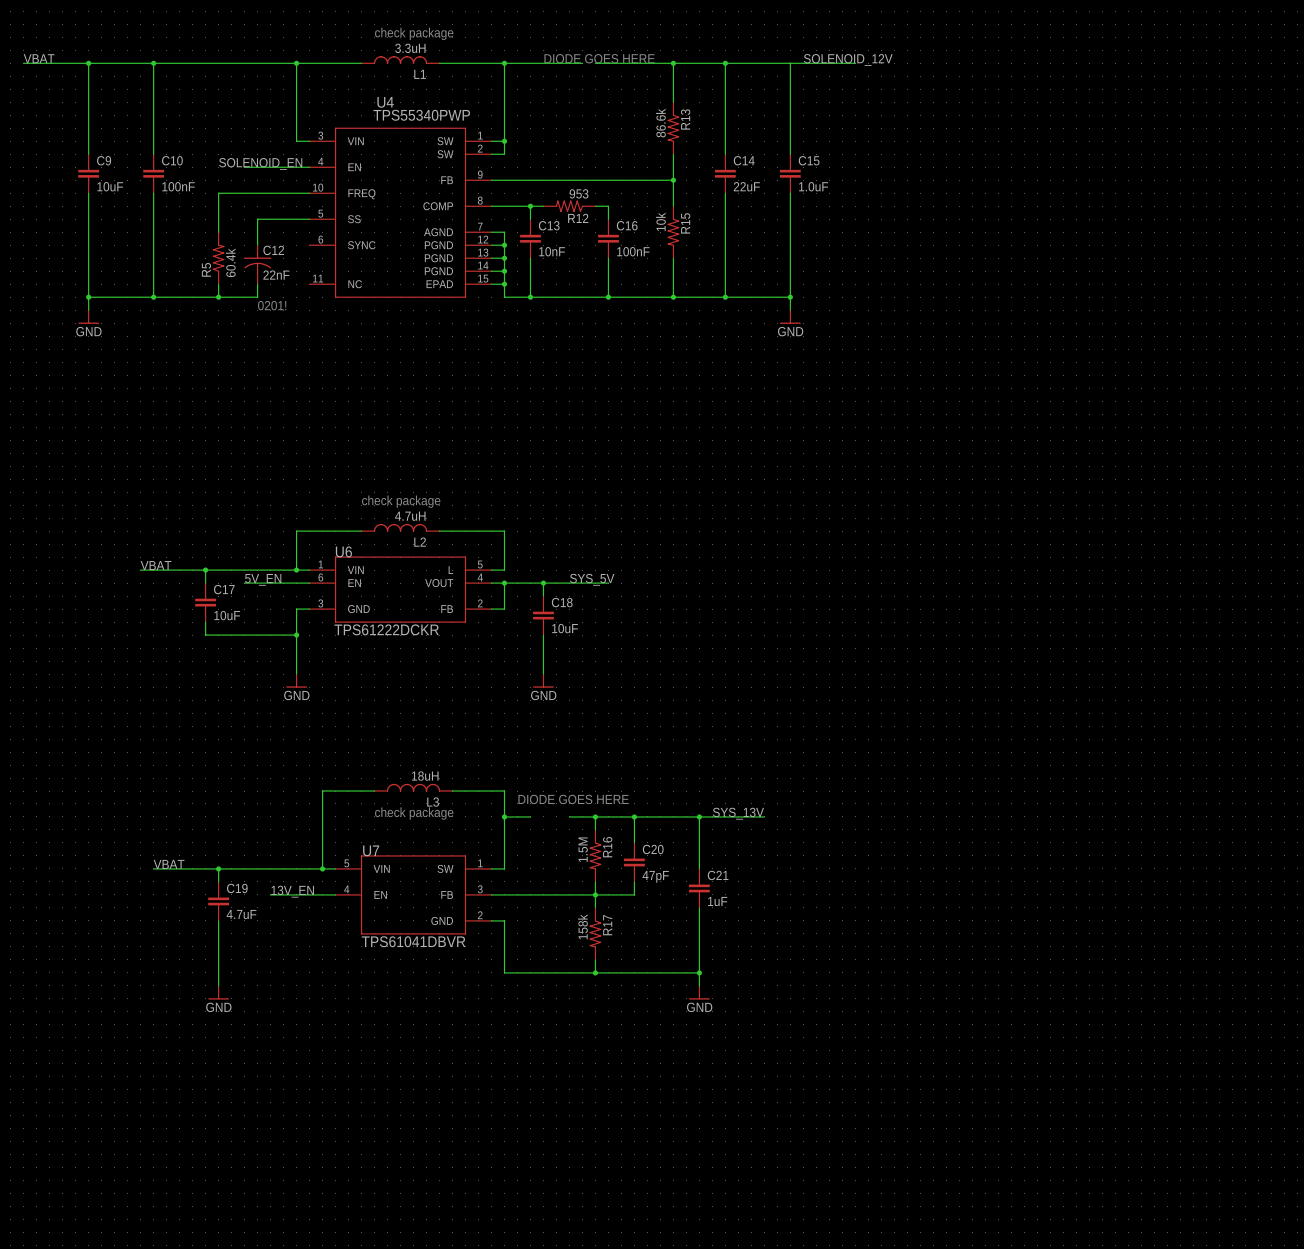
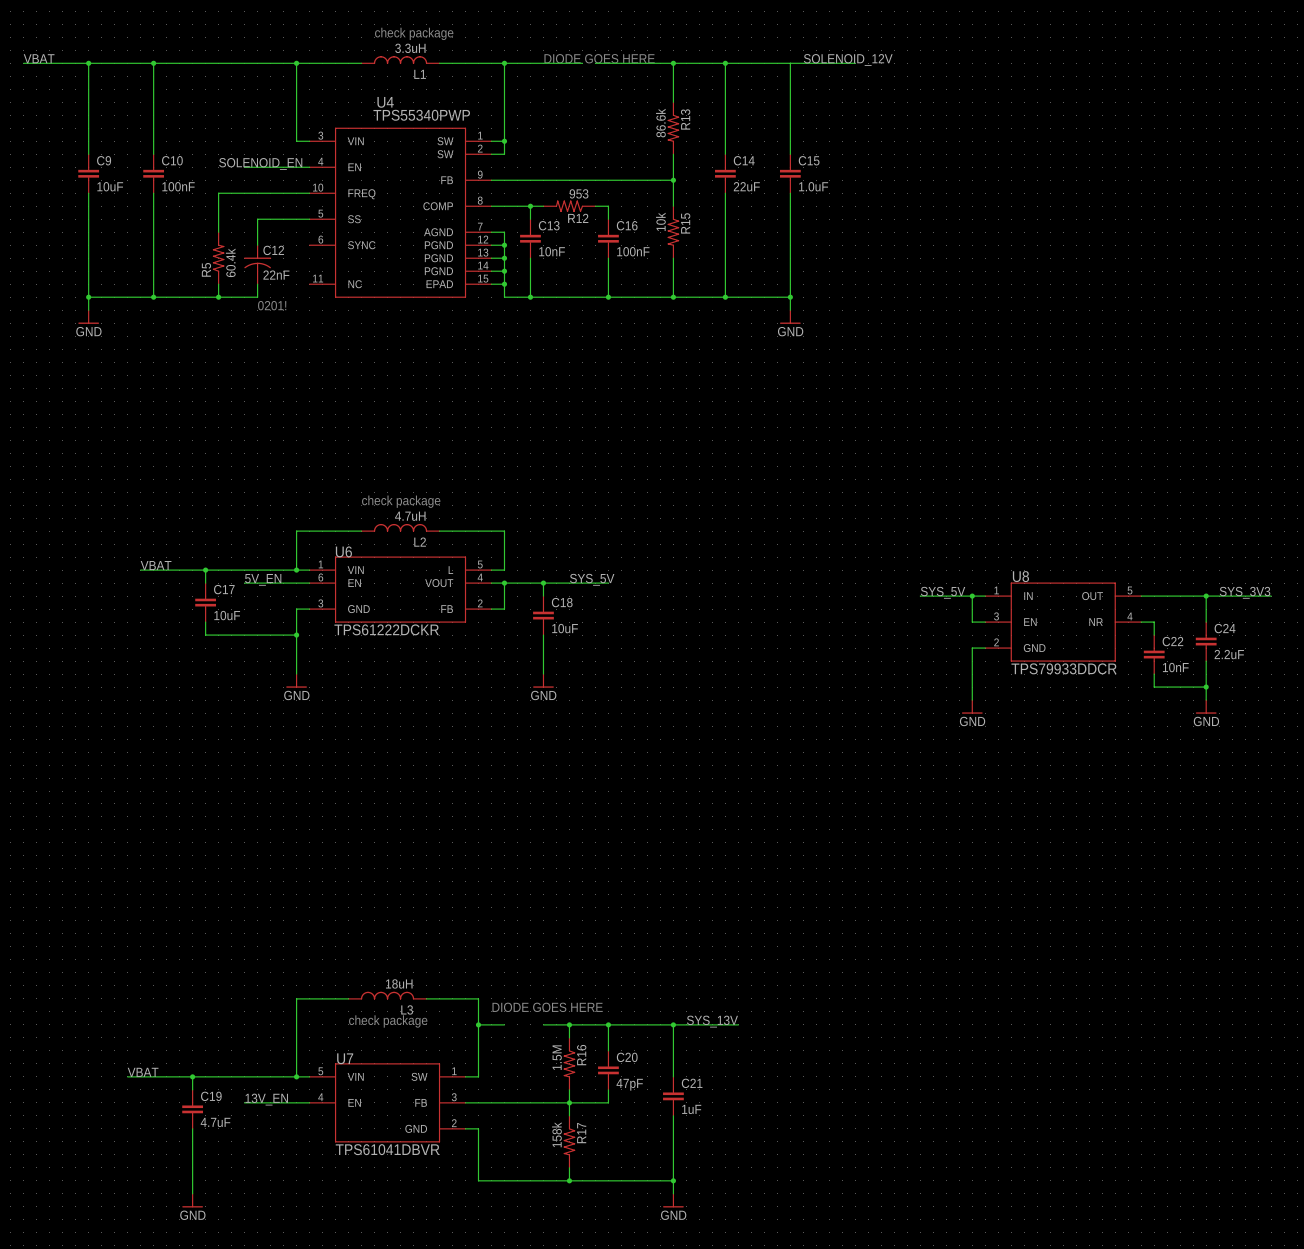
label: none -> SYS_5V (943, 592)
label: none -> SYS_3V3 (1245, 592)
wire: none -> (920, 596) (985, 596)
wire: none -> (972, 596) (972, 622) (985, 622)
junction: none -> (972, 596)
wire: none -> (1141, 596) (1271, 596)
wire: none -> (1206, 596) (1206, 622)
junction: none -> (1206, 596)
U8: none -> TPS79933DDCR (1063, 622)
wire: none -> (1141, 622) (1154, 622) (1154, 635)
C24: none -> 2.2uF (1206, 641)
wire: none -> (985, 648) (972, 648) (972, 700)
C22: none -> 10nF (1154, 654)
wire: none -> (1206, 661) (1206, 700)
wire: none -> (1154, 674) (1154, 687) (1206, 687)
junction: none -> (1206, 687)
power symbol: none -> GND (972, 706)
power symbol: none -> GND (1206, 706)
L3 position: (413, 787) -> (387, 995)
wire: (374, 791) (322, 791) (322, 868) -> none
wire: (452, 791) (504, 791) (504, 868) (491, 868) -> none
text: DIODE GOES HERE (573, 799) -> none
text: check package (414, 813) -> none
label: SYS_13V (738, 813) -> none
wire: (504, 816) (530, 816) -> none
junction: (504, 816) -> none
wire: (569, 816) (764, 816) -> none
wire: (595, 816) (595, 829) -> none
junction: (595, 816) -> none
wire: (634, 816) (634, 842) -> none
junction: (634, 816) -> none
wire: (699, 816) (699, 868) -> none
junction: (699, 816) -> none
R16 position: (595, 855) -> (569, 1063)
C20 position: (634, 862) -> (608, 1070)
label: VBAT (169, 864) -> none
wire: (153, 868) (335, 868) -> none
wire: (218, 868) (218, 881) -> none
junction: (218, 868) -> none
junction: (322, 868) -> none
wire: (595, 881) (595, 907) -> none
wire: (634, 881) (634, 894) (491, 894) -> none
C21 position: (699, 888) -> (673, 1096)
label: 13V_EN (292, 891) -> none
wire: (270, 894) (335, 894) -> none
U7 position: (413, 894) -> (387, 1102)
junction: (595, 894) -> none
C19 position: (218, 901) -> (192, 1109)
wire: (699, 907) (699, 985) -> none
wire: (218, 920) (218, 985) -> none
wire: (491, 920) (504, 920) (504, 972) (699, 972) -> none
R17 position: (595, 933) -> (569, 1141)
wire: (595, 959) (595, 972) -> (569, 1024) (569, 1037)
junction: (595, 972) -> none
junction: (699, 972) -> none
power symbol: GND (218, 992) -> none
power symbol: GND (699, 992) -> none
wire: none -> (348, 998) (296, 998) (296, 1076)
wire: none -> (426, 998) (478, 998) (478, 1076) (465, 1076)
text: none -> DIODE GOES HERE (547, 1007)
text: none -> check package (388, 1021)
label: none -> SYS_13V (712, 1021)
wire: none -> (478, 1024) (504, 1024)
junction: none -> (478, 1024)
wire: none -> (543, 1024) (738, 1024)
junction: none -> (569, 1024)
wire: none -> (608, 1024) (608, 1050)
junction: none -> (608, 1024)
wire: none -> (673, 1024) (673, 1076)
junction: none -> (673, 1024)
label: none -> VBAT (143, 1072)
wire: none -> (127, 1076) (309, 1076)
wire: none -> (192, 1076) (192, 1089)
junction: none -> (192, 1076)
junction: none -> (296, 1076)
wire: none -> (569, 1089) (569, 1115)
wire: none -> (608, 1089) (608, 1102) (465, 1102)
label: none -> 13V_EN (266, 1099)
wire: none -> (244, 1102) (309, 1102)
junction: none -> (569, 1102)
wire: none -> (673, 1115) (673, 1193)
wire: none -> (192, 1128) (192, 1193)
wire: none -> (465, 1128) (478, 1128) (478, 1180) (673, 1180)
wire: none -> (569, 1167) (569, 1180)
junction: none -> (569, 1180)
junction: none -> (673, 1180)
power symbol: none -> GND (192, 1200)
power symbol: none -> GND (673, 1200)

